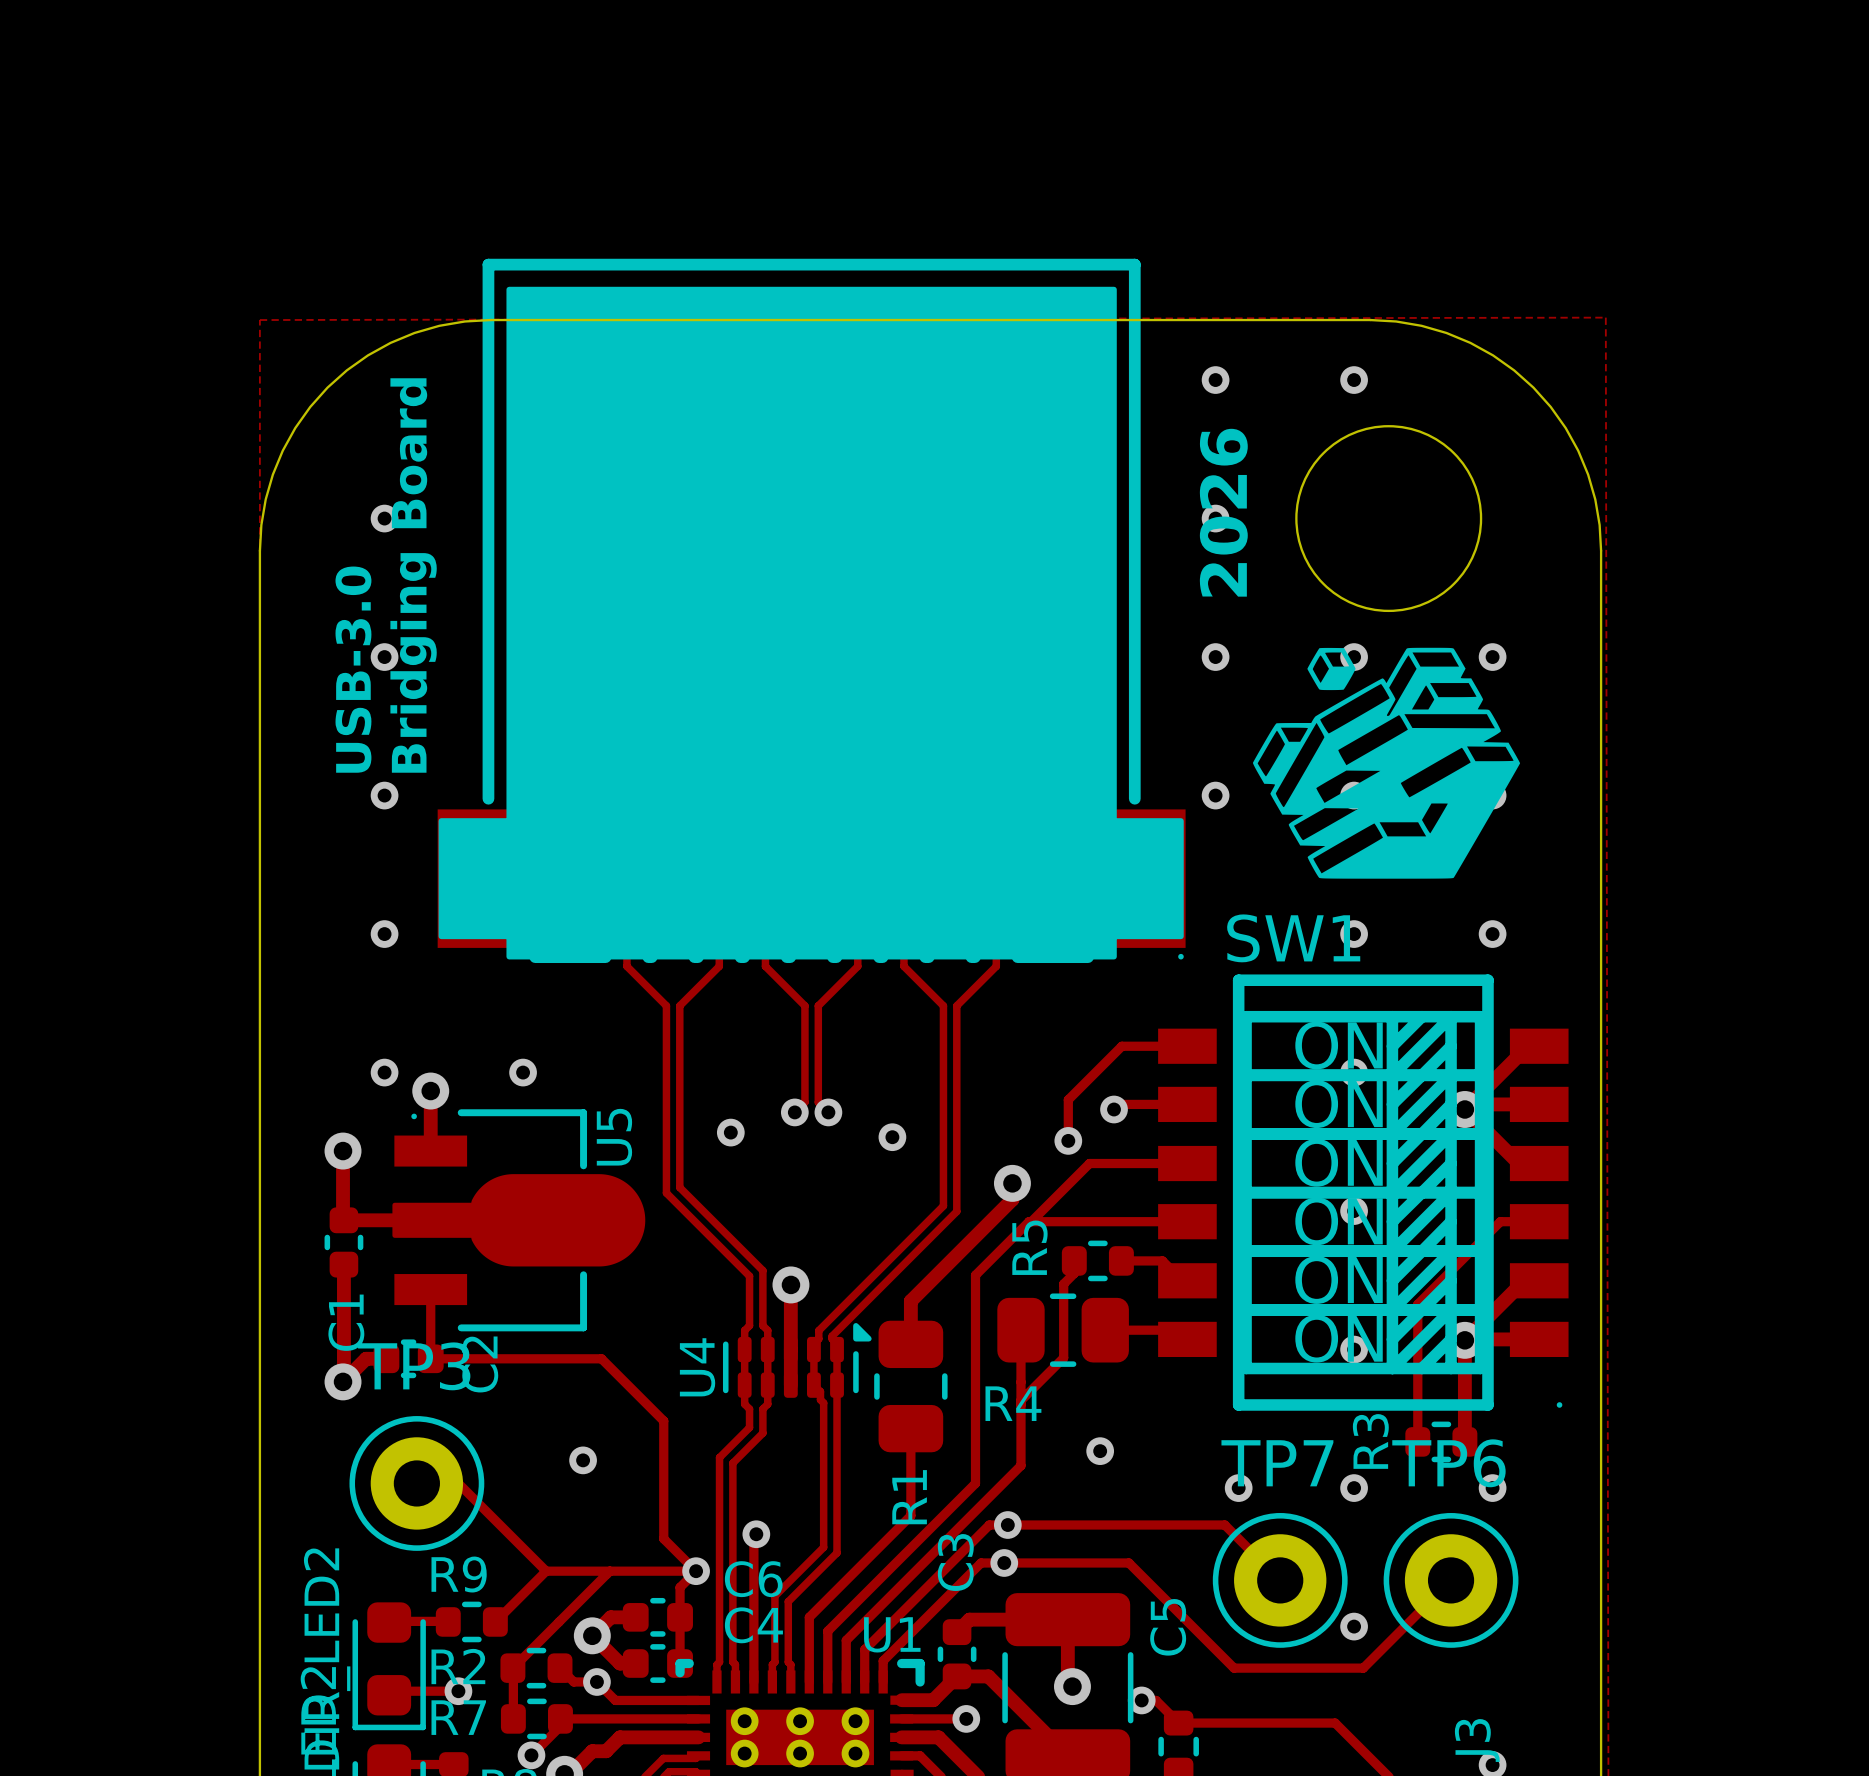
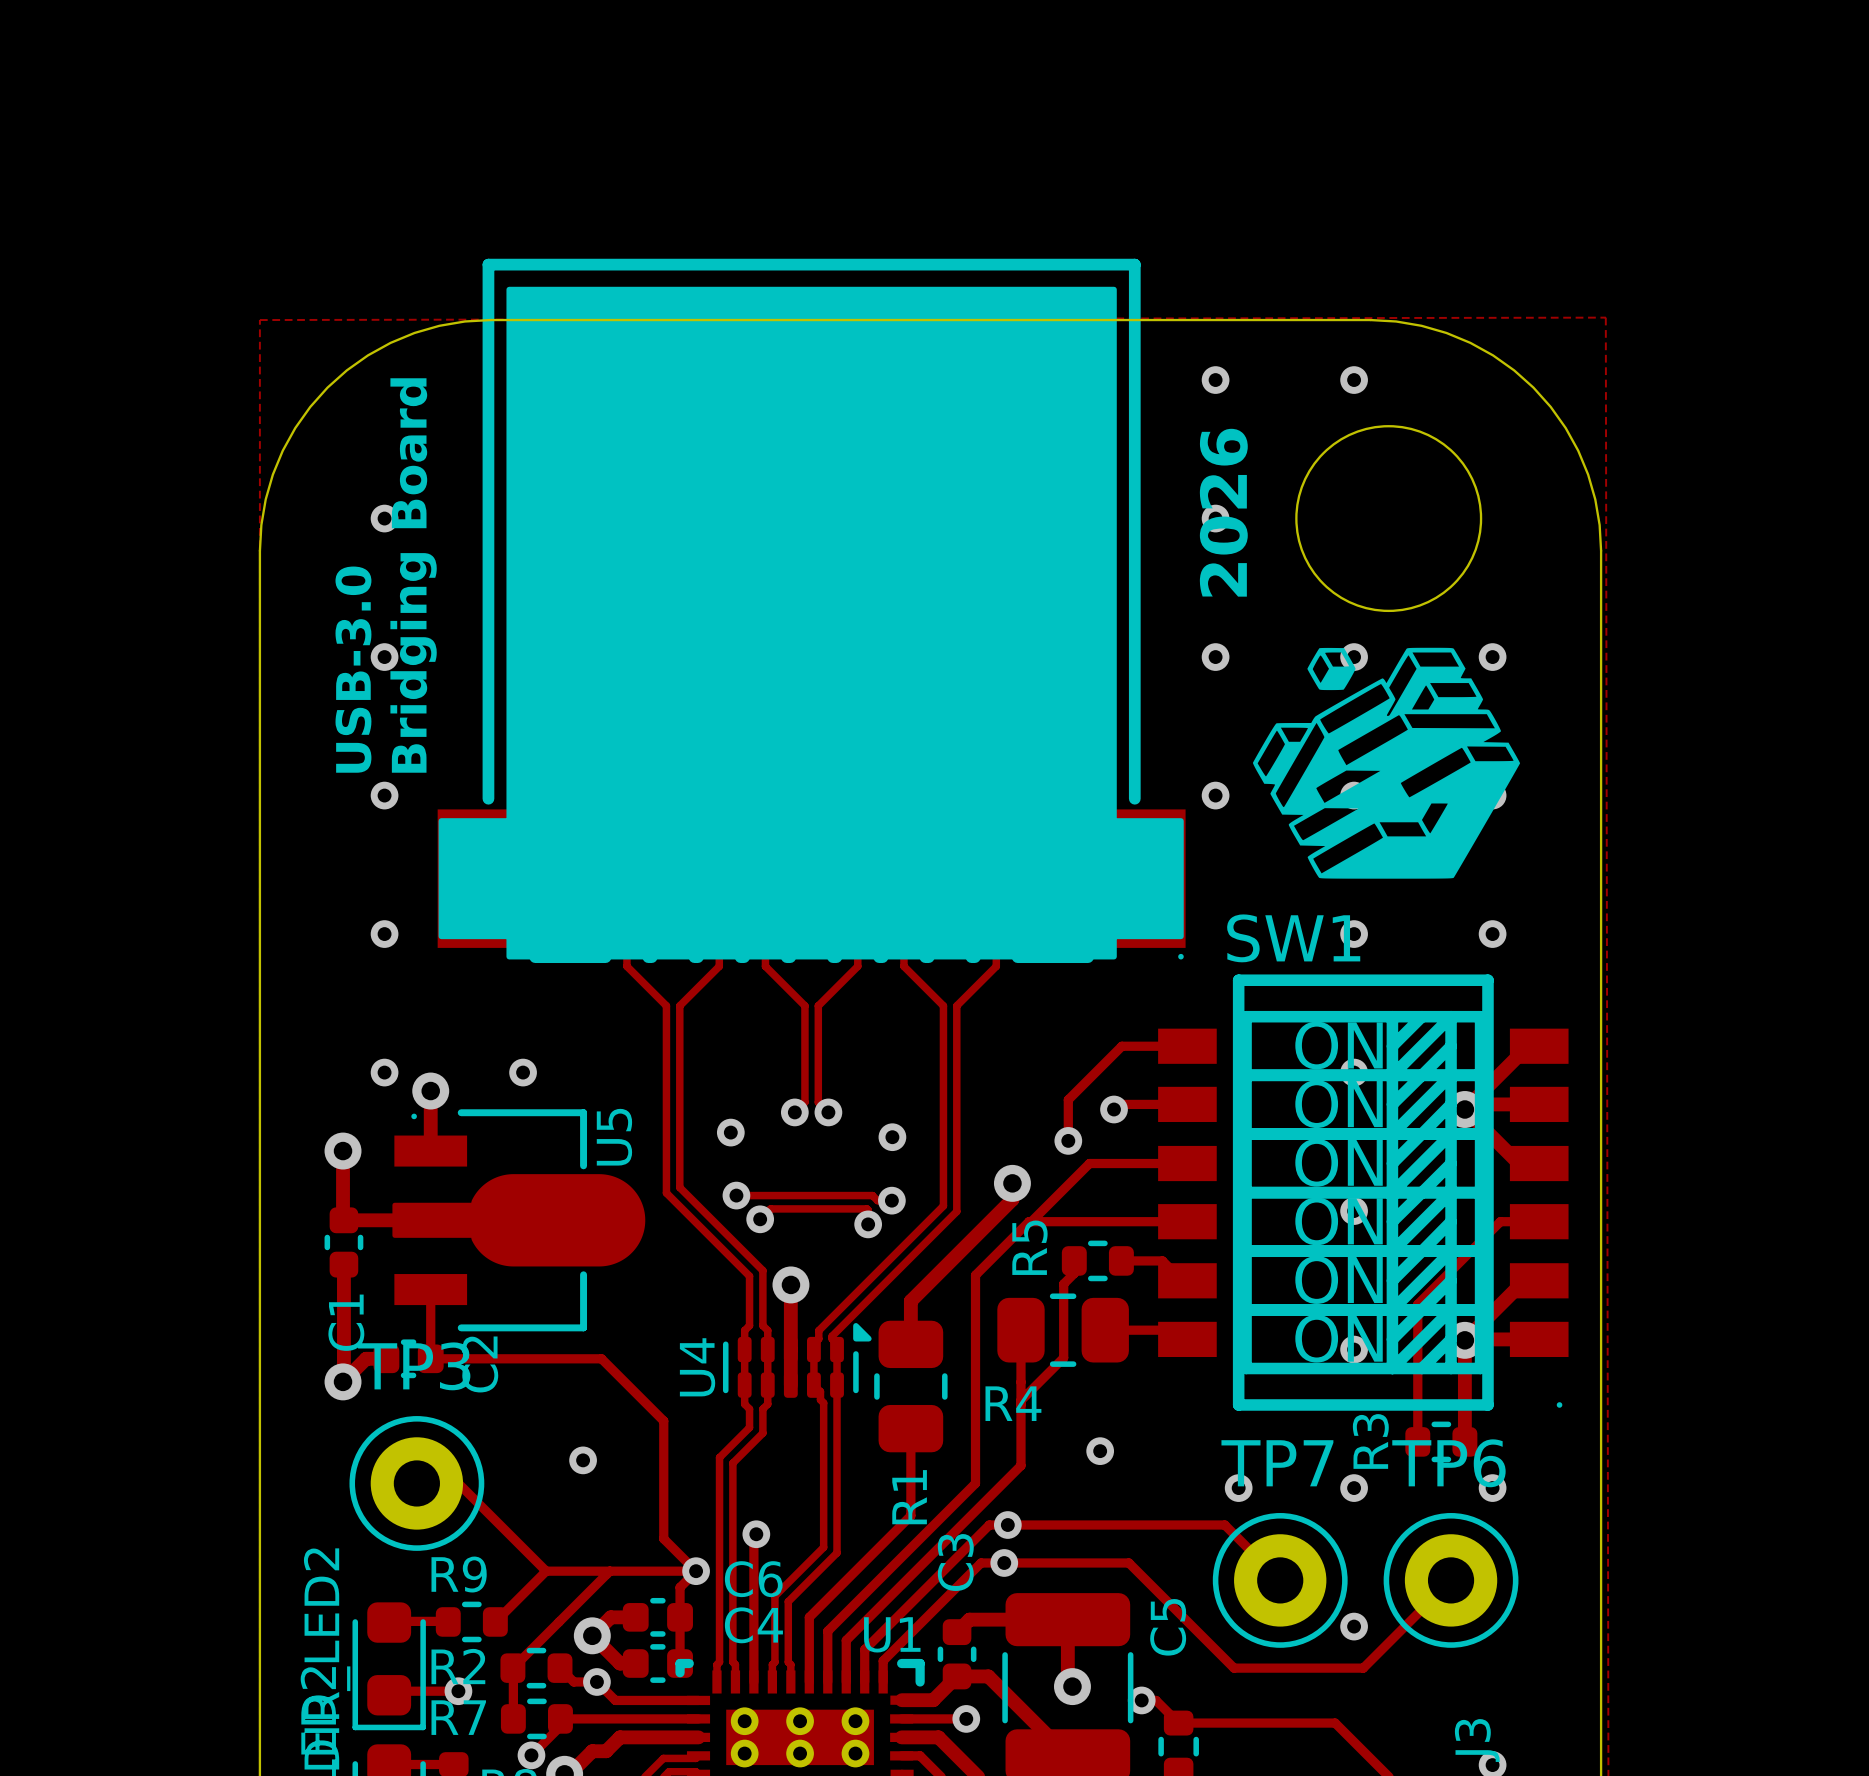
track: none -> (736, 1195) (872, 1195) (877, 1200) (891, 1200)
via: none -> (736, 1195)
via: none -> (891, 1200)
track: none -> (760, 1219) (770, 1208) (866, 1208) (868, 1224)
via: none -> (760, 1219)
via: none -> (868, 1224)

